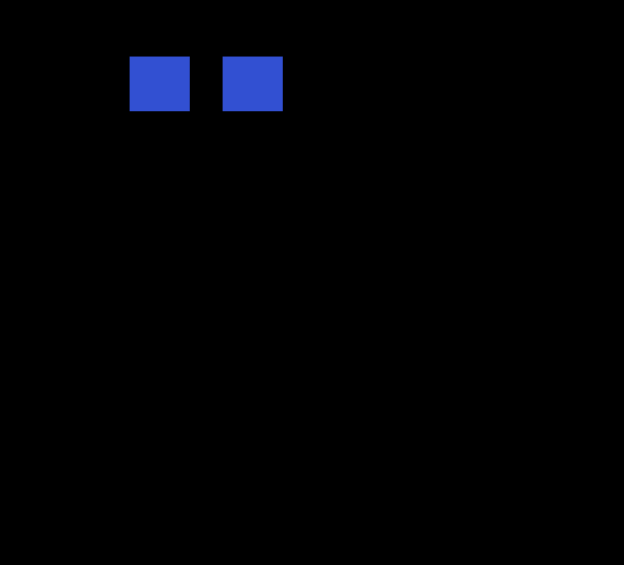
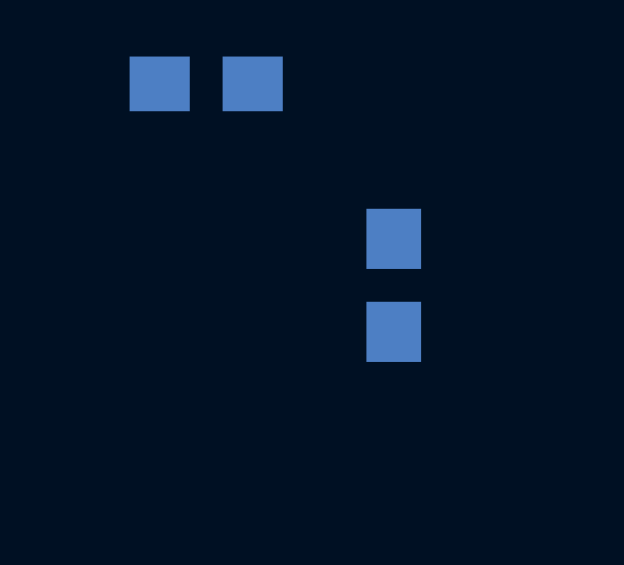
part: none -> (393, 285)

